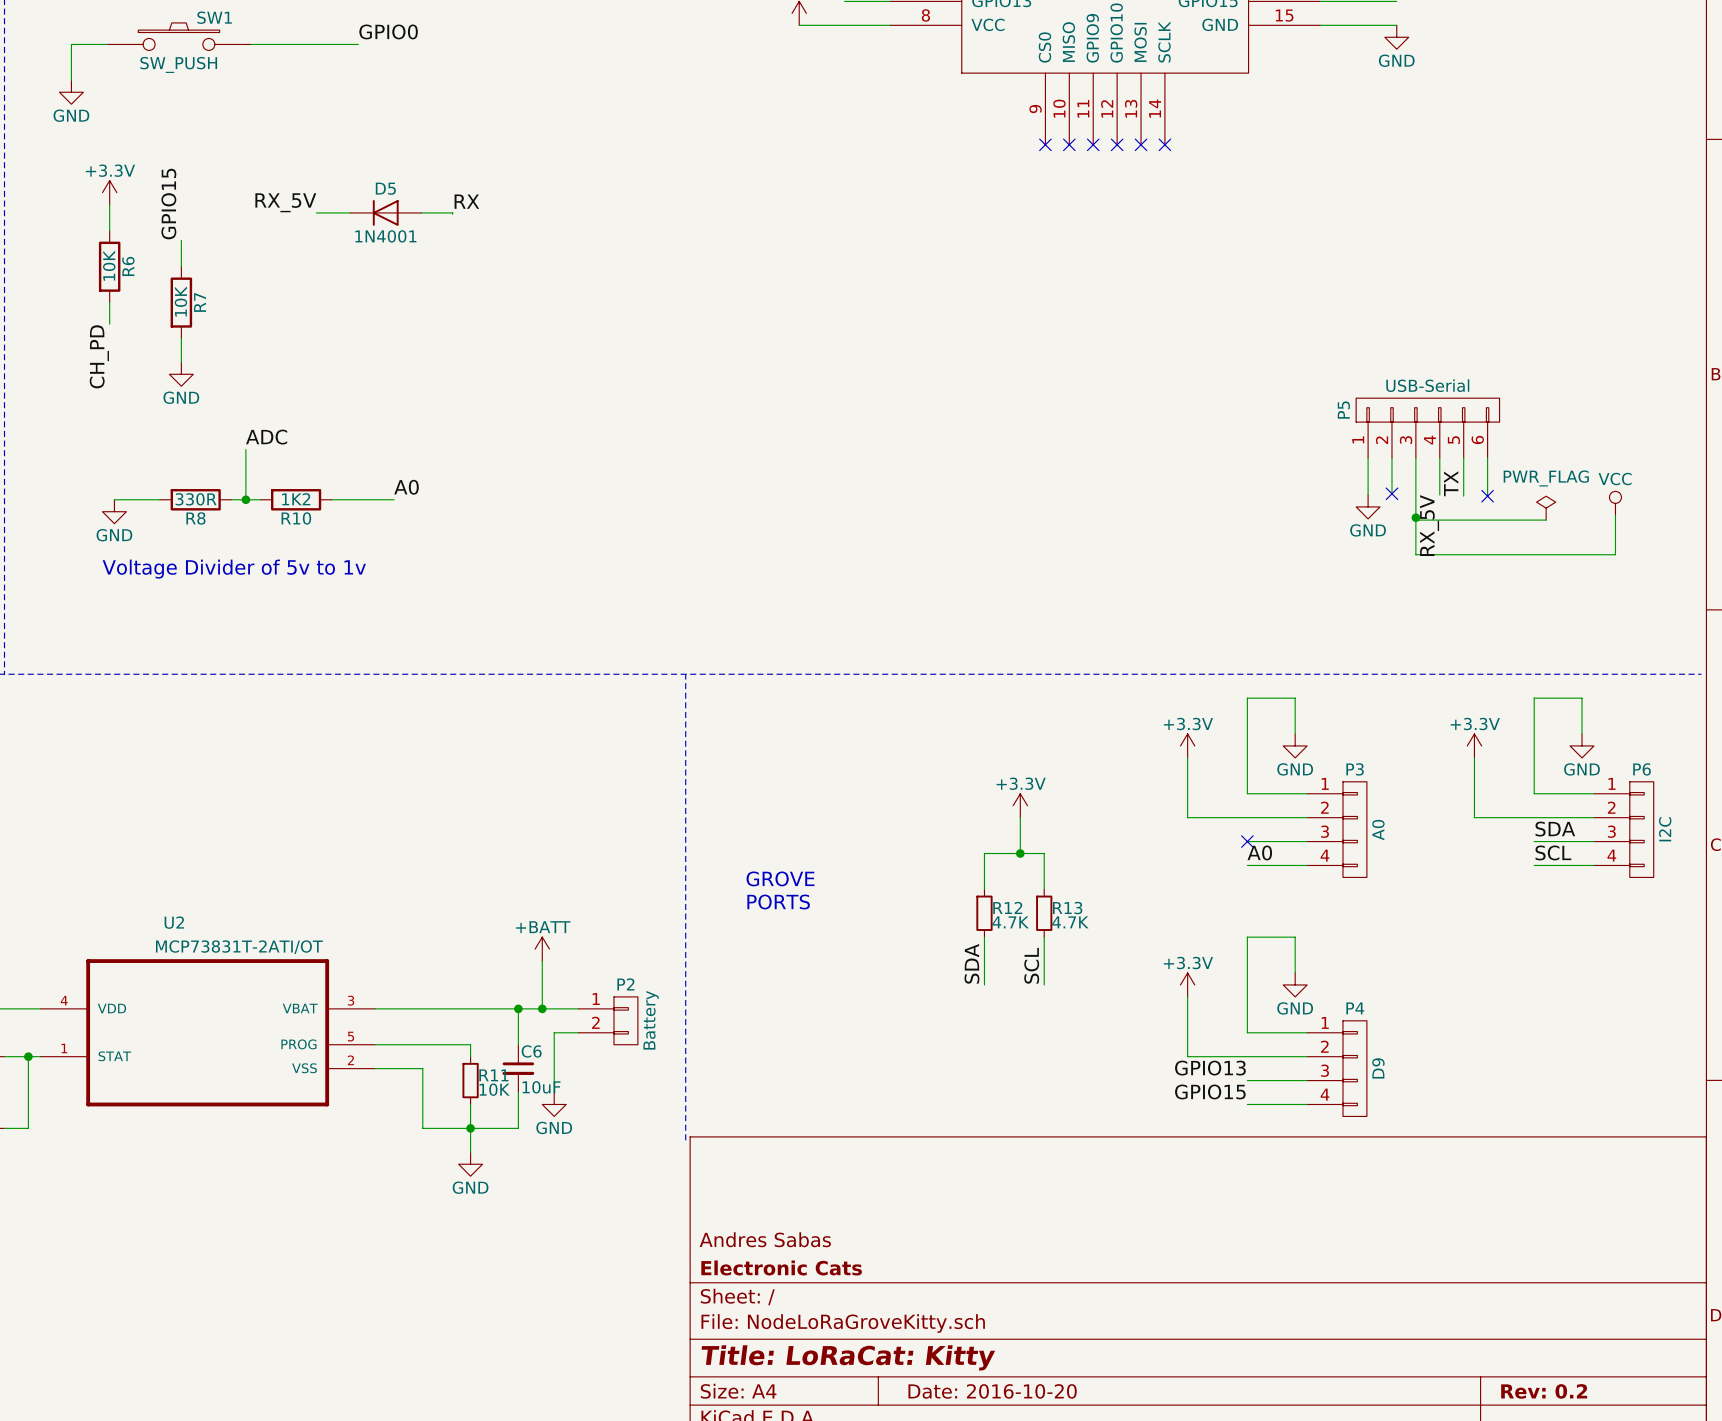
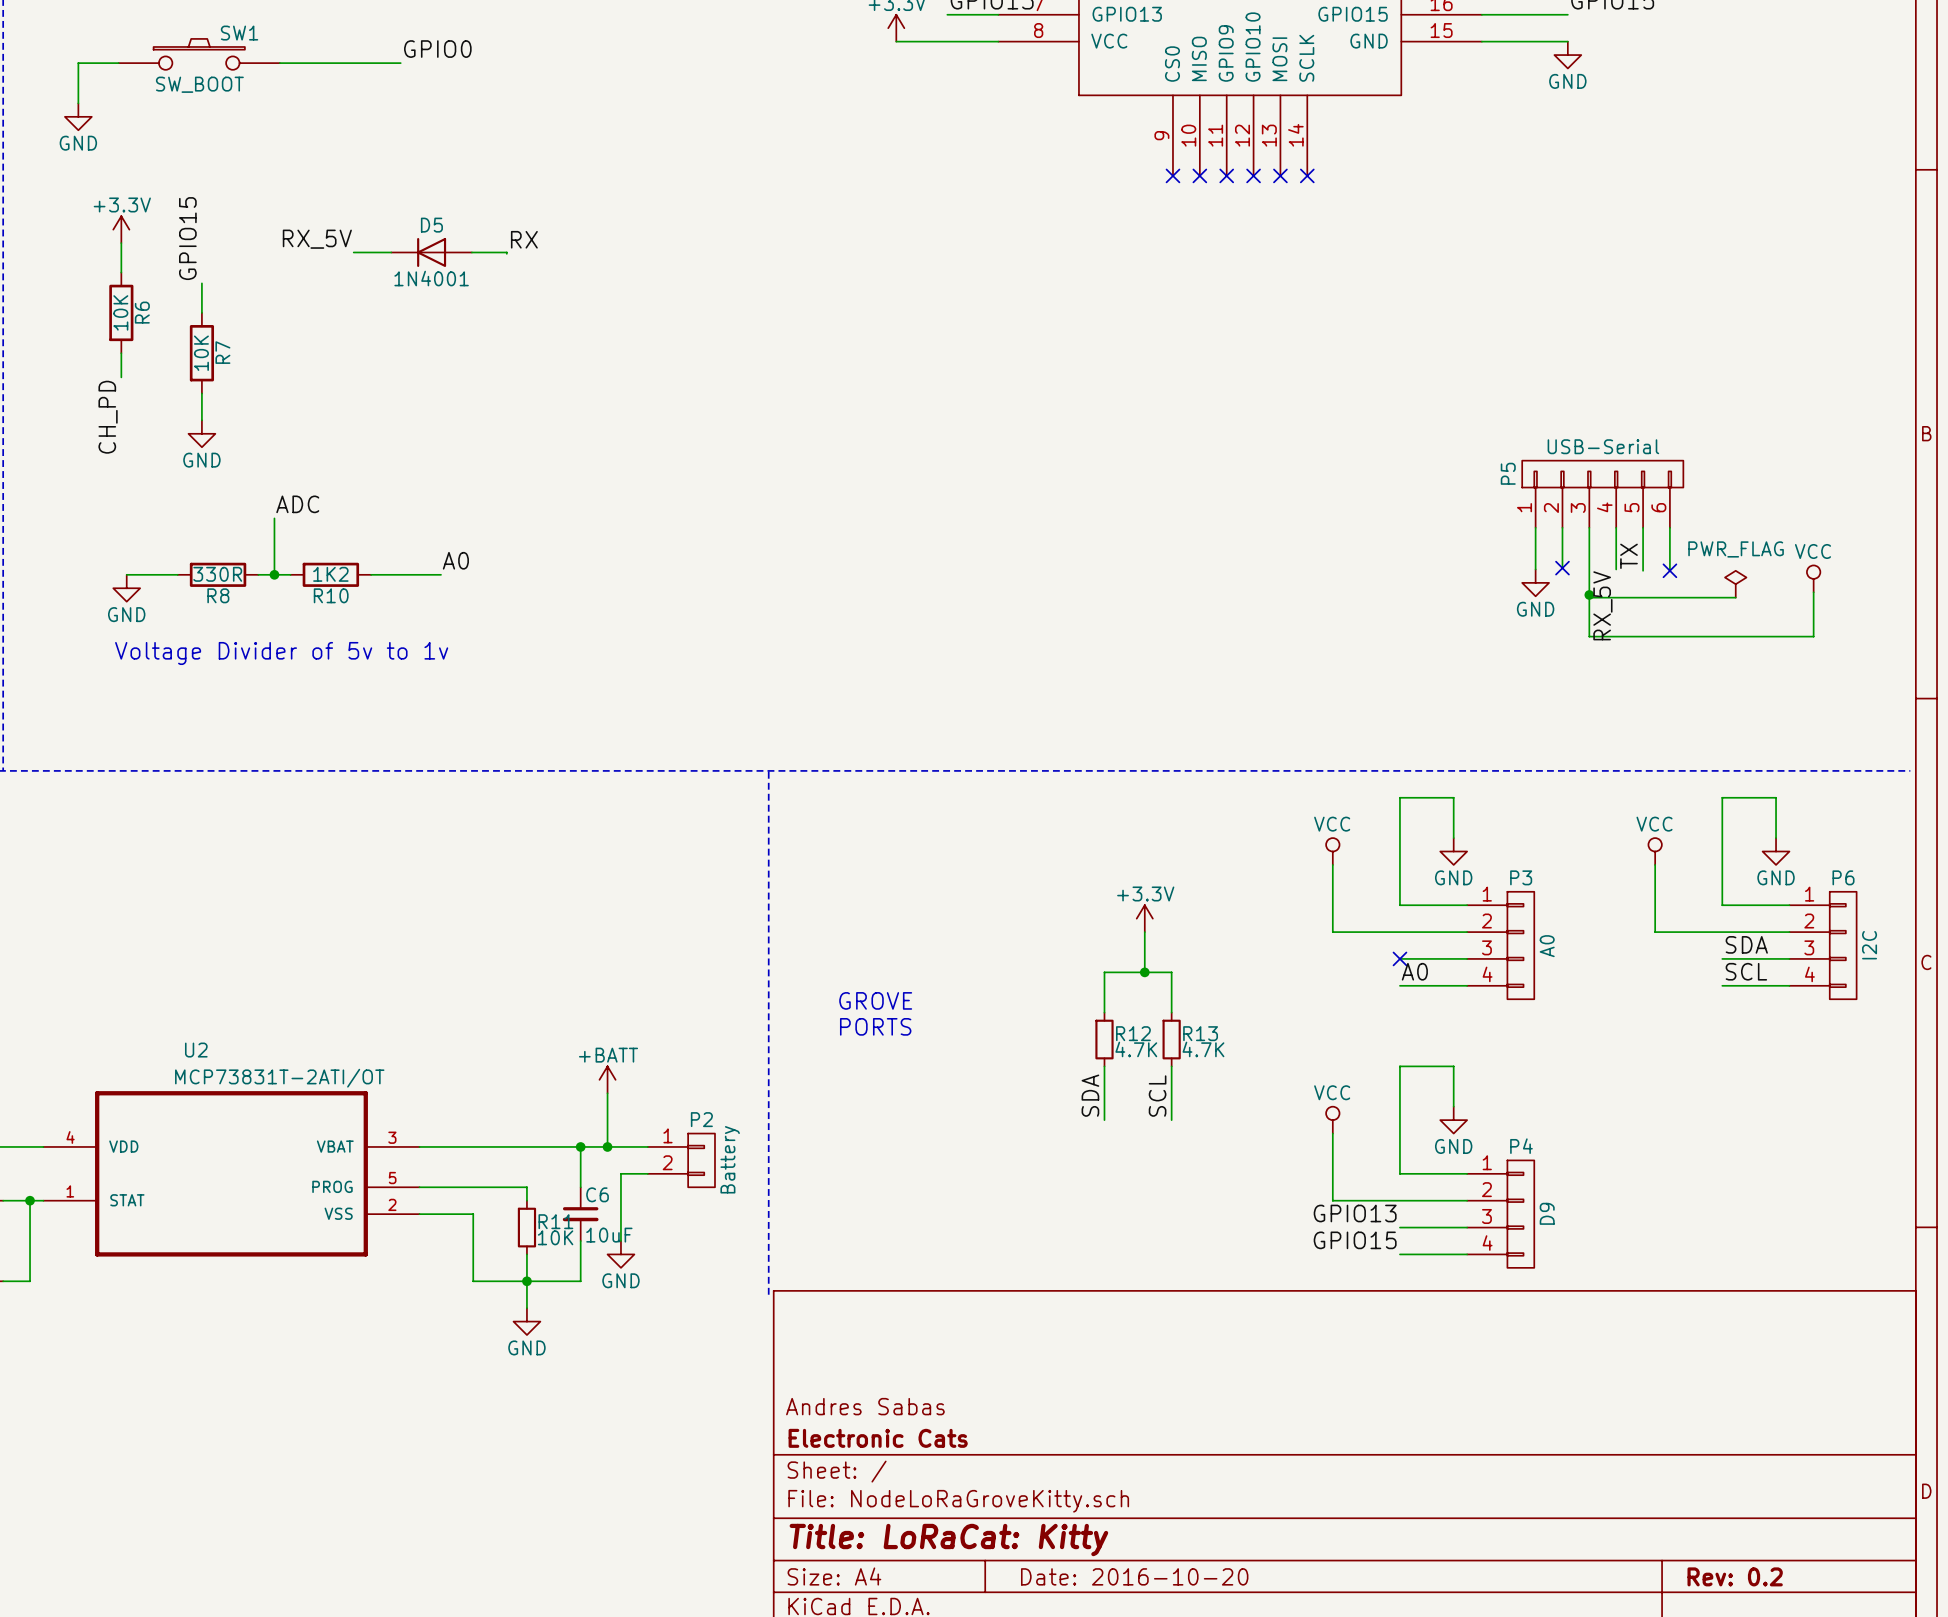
SW1 value: SW_PUSH (178, 64) -> SW_BOOT (199, 84)
power symbol: +3.3V (1187, 745) -> VCC (1332, 851)
power symbol: +3.3V (1474, 745) -> VCC (1655, 851)
power symbol: +3.3V (1187, 984) -> VCC (1332, 1120)

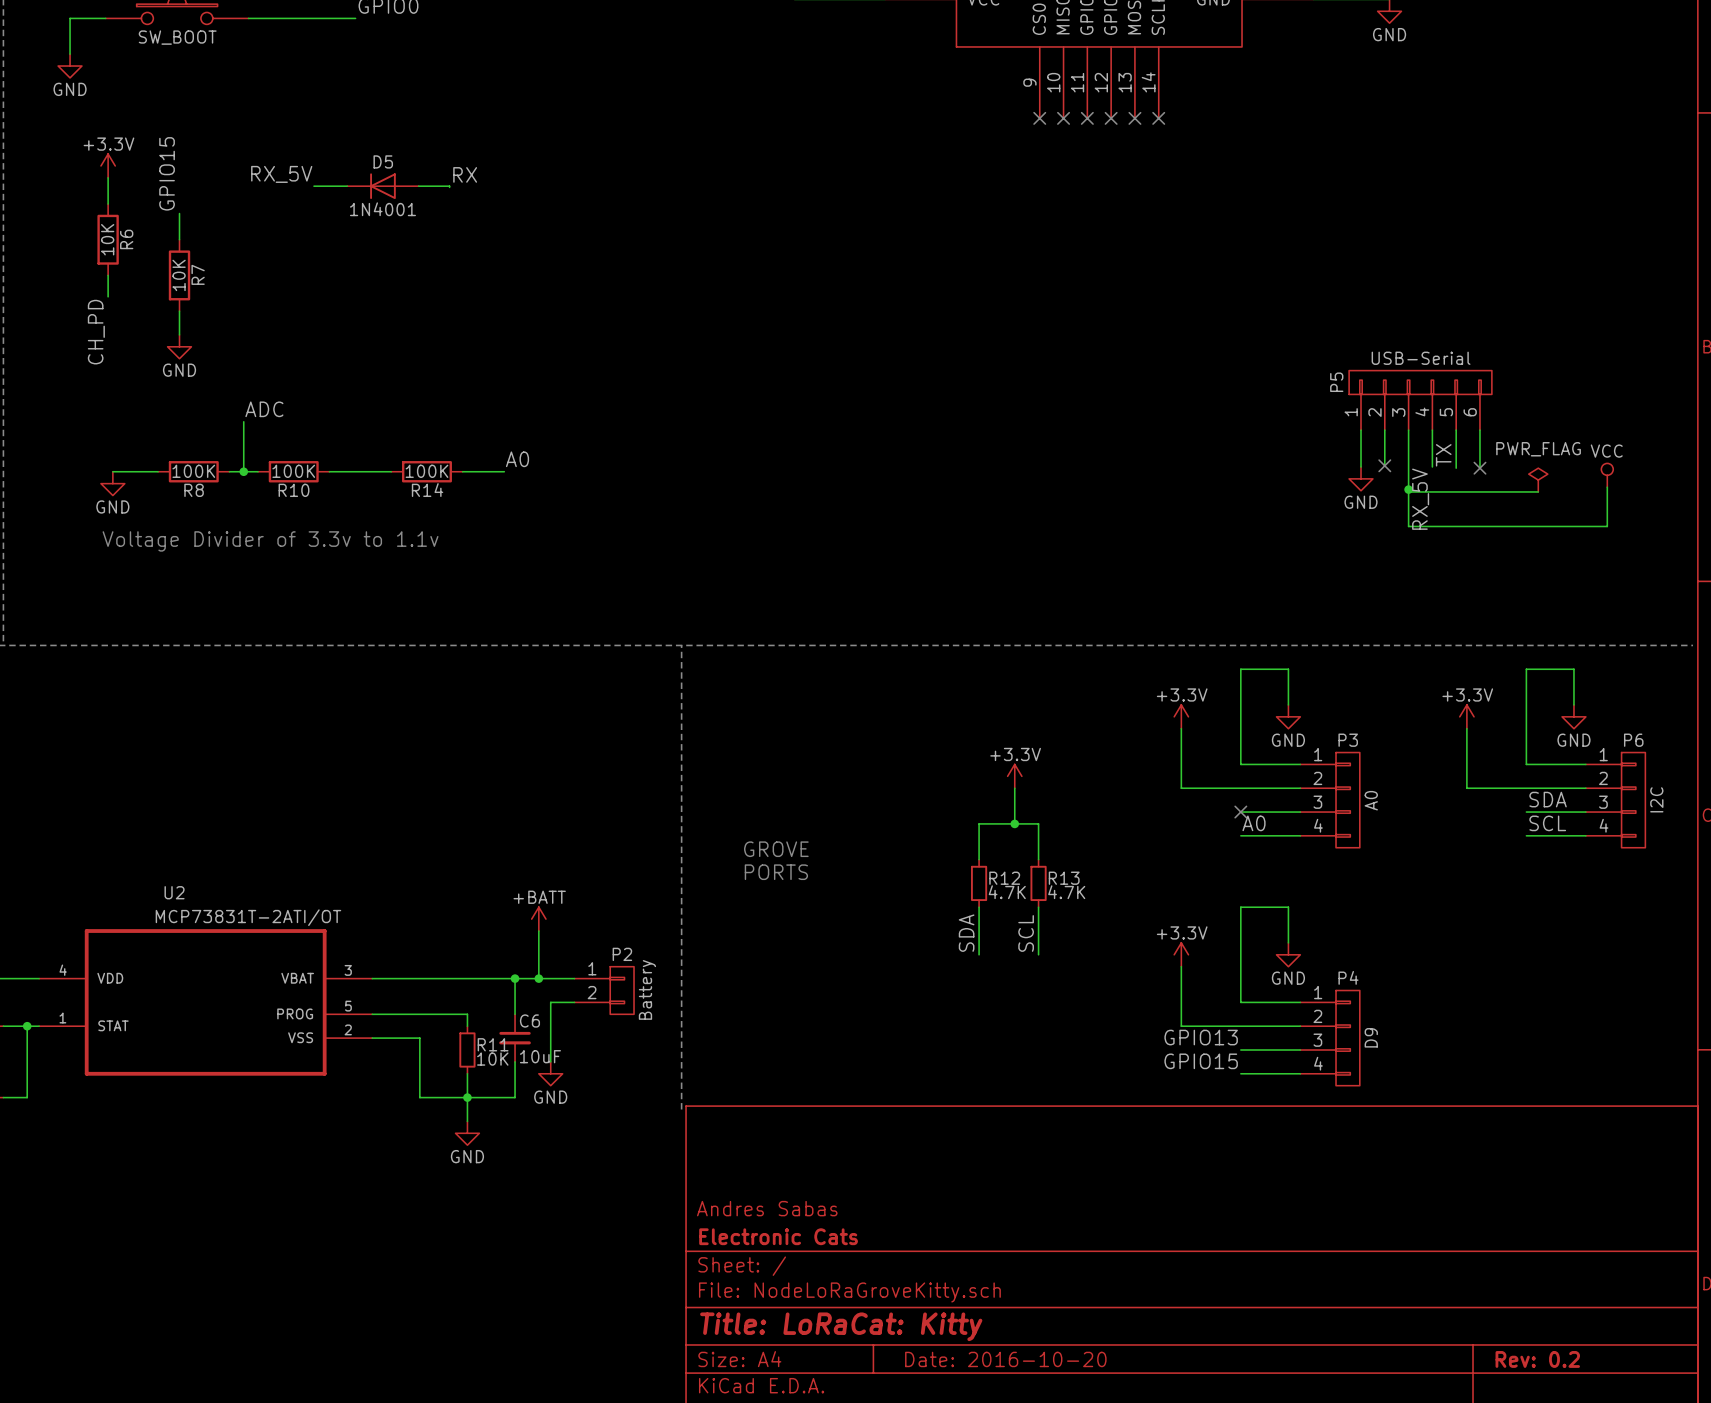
label position: A0 (455, 560) -> A0 (517, 459)
R8 value: 330R (217, 574) -> 100K (193, 471)
R10 value: 1K2 (330, 574) -> 100K (293, 471)
R14: none -> 100K (426, 471)
wire: none -> (462, 471) (504, 471)
text: Voltage Divider of 5v to 1v (281, 653) -> Voltage Divider of 3.3v to 1.1v (270, 541)
power symbol: VCC (1332, 851) -> +3.3V (1181, 716)
power symbol: VCC (1655, 851) -> +3.3V (1466, 716)
power symbol: VCC (1332, 1120) -> +3.3V (1181, 954)

